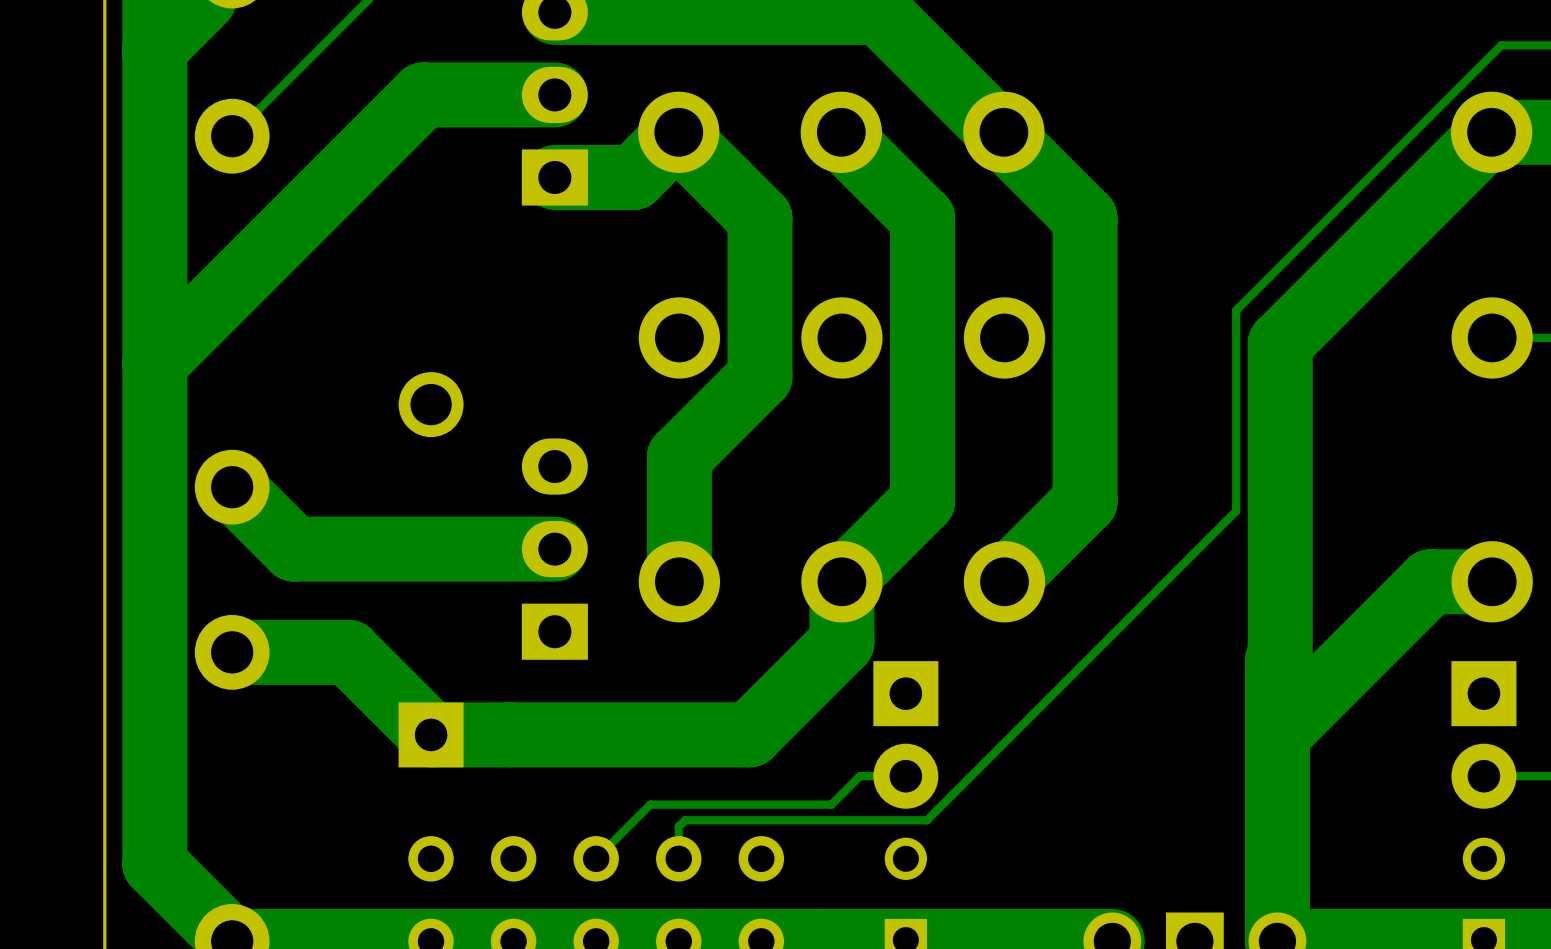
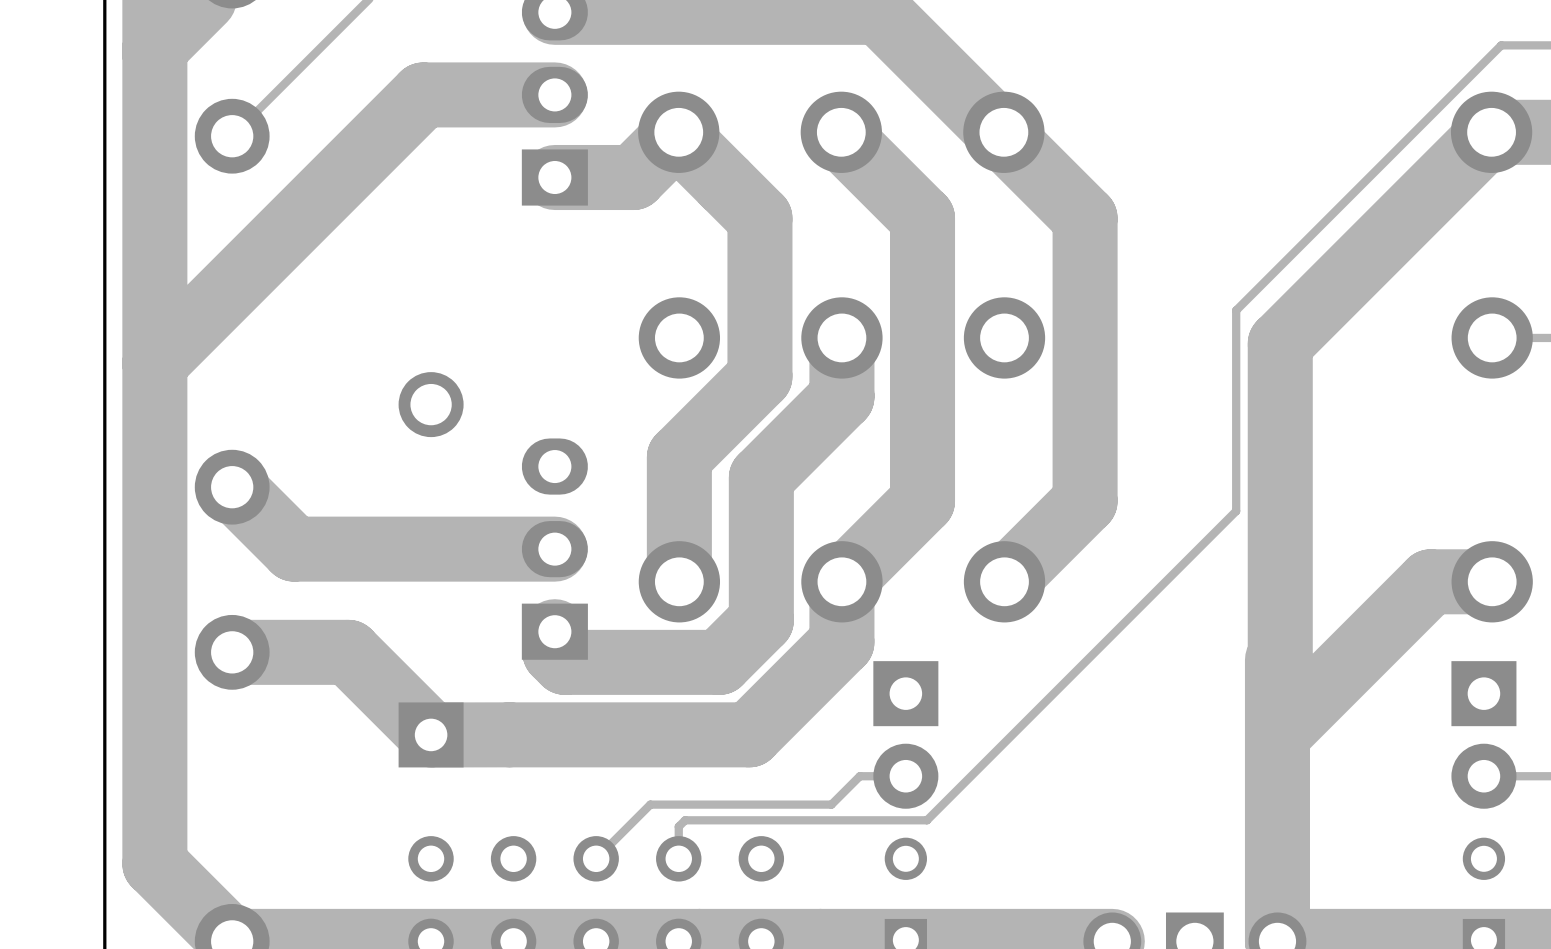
track: none -> (841, 337) (841, 397) (761, 477) (761, 620) (719, 662) (564, 662) (554, 652) (554, 631)

